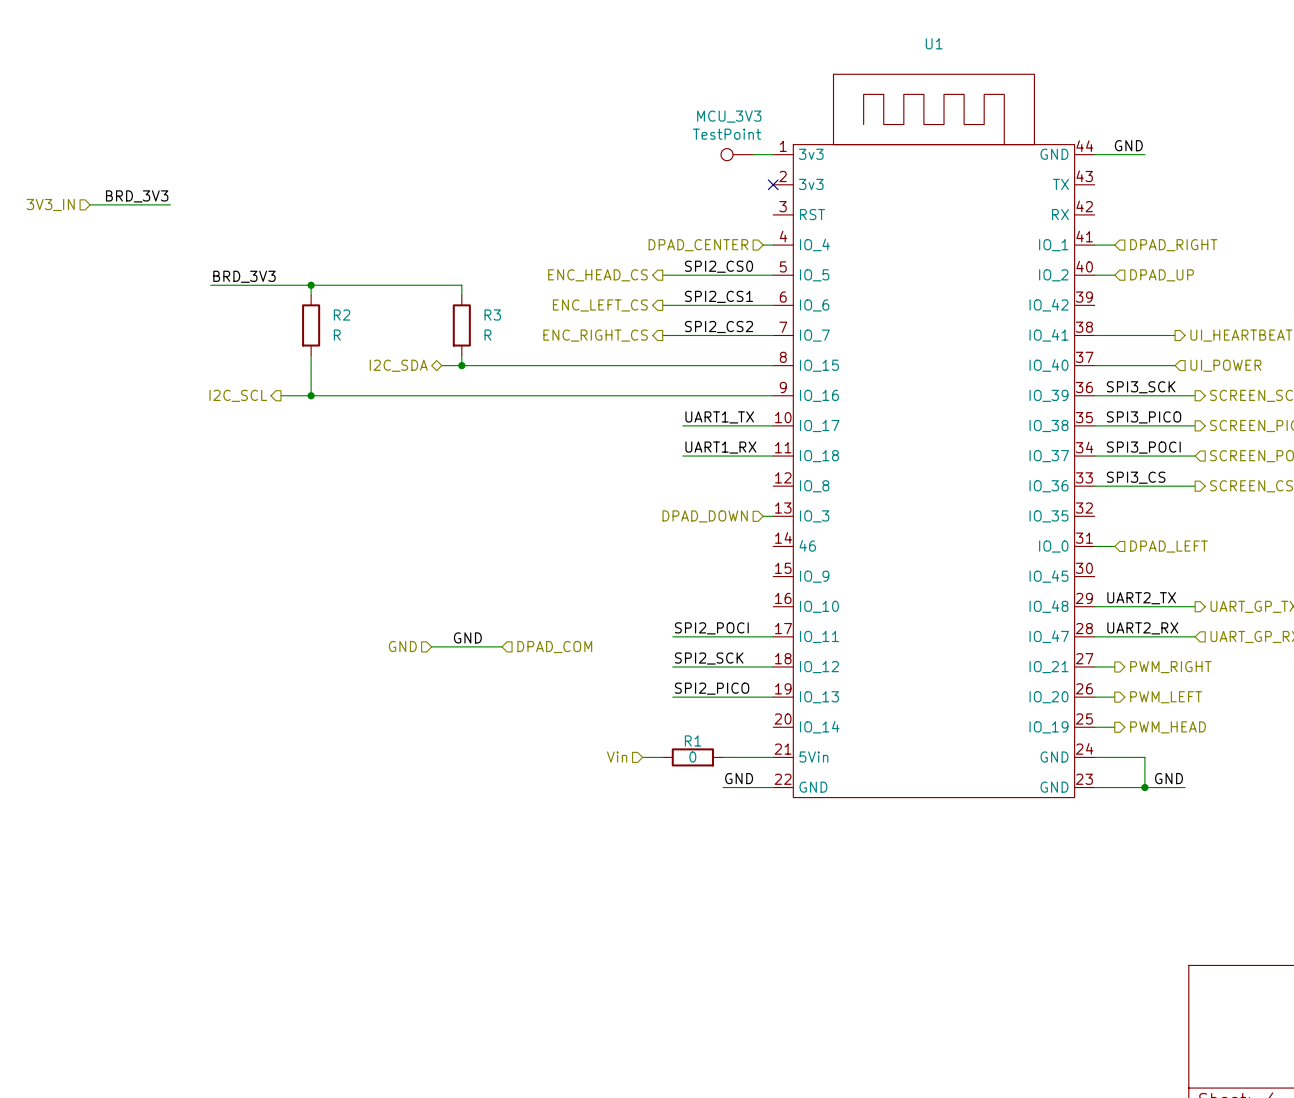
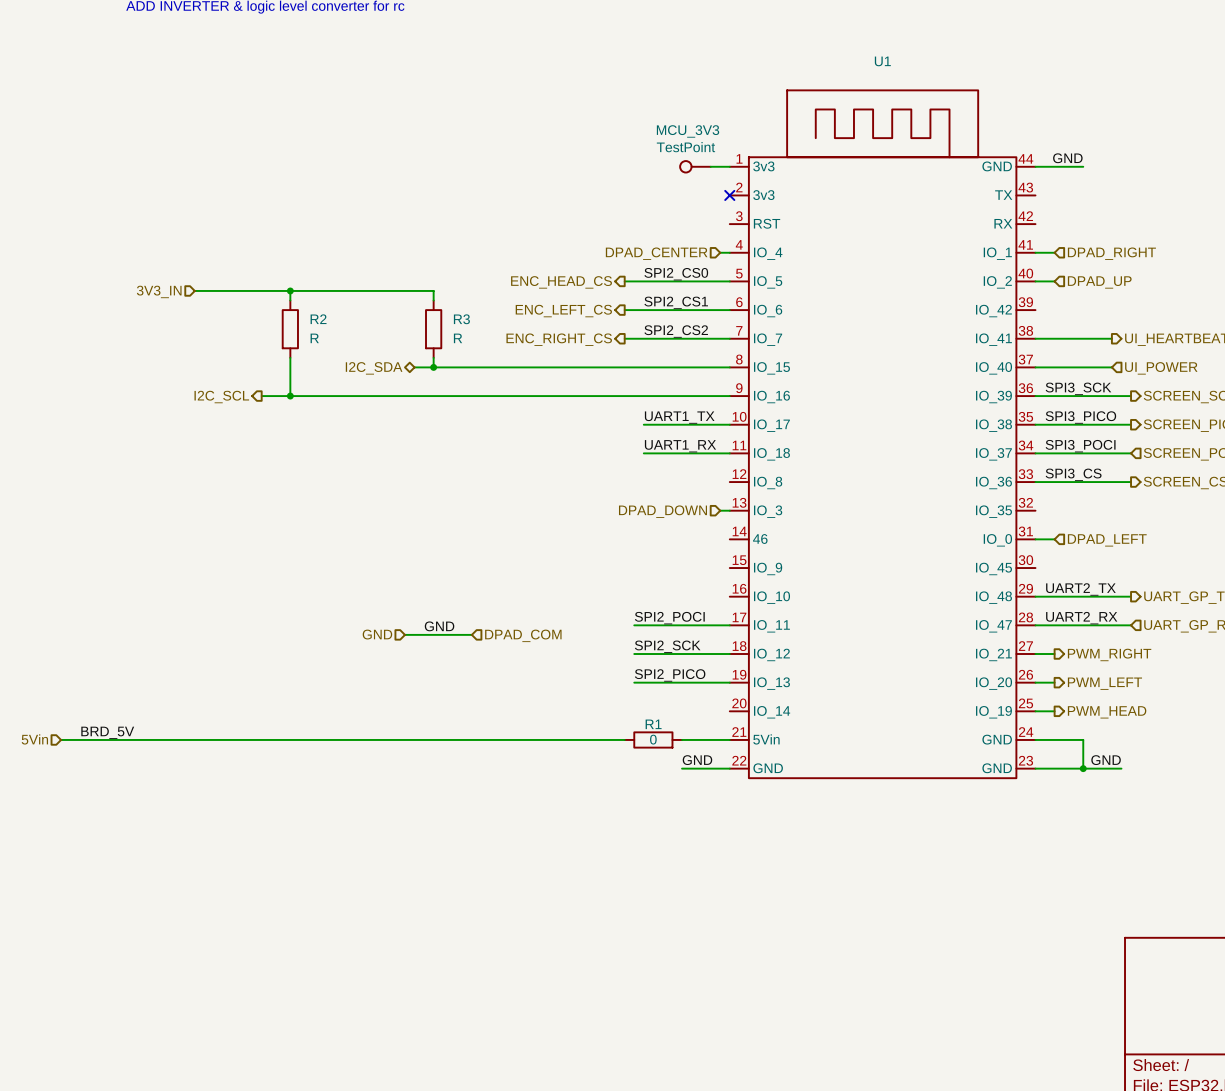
label: BRD_3V3 (137, 196) -> none
hierarchical label position: 3V3_IN (50, 204) -> 3V3_IN (159, 291)
wire: (90, 204) (170, 204) -> none
label: BRD_3V3 (244, 276) -> none
label: none -> BRD_5V (107, 732)
hierarchical label: none -> 5Vin (34, 739)
wire: none -> (61, 739) (605, 739)
hierarchical label: Vin (617, 757) -> none

